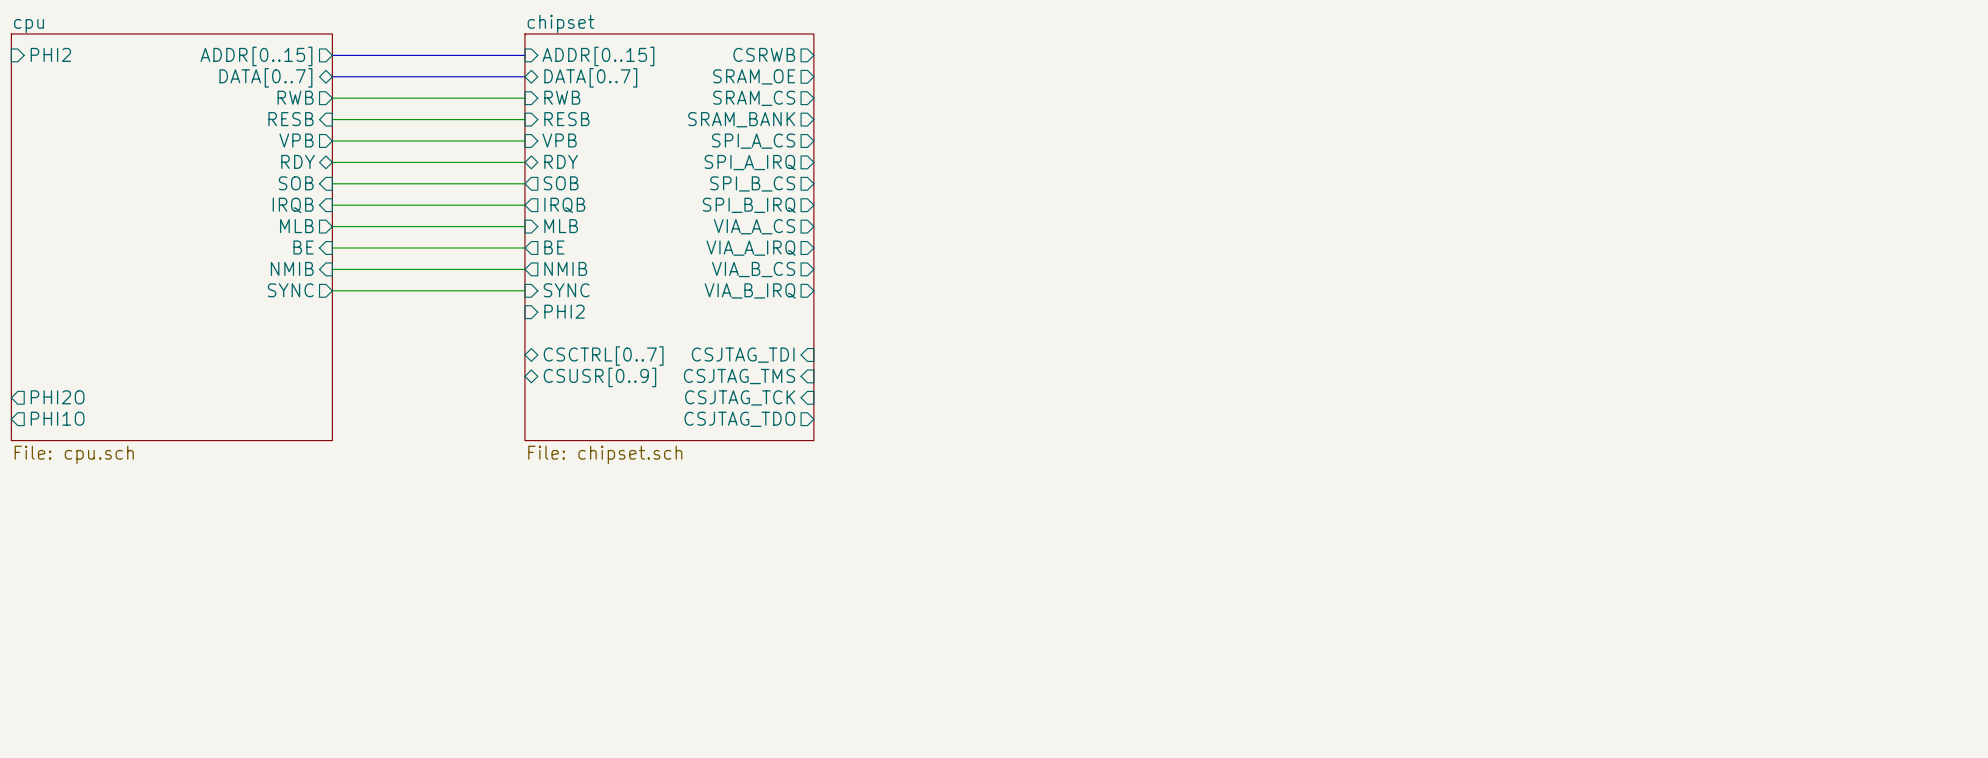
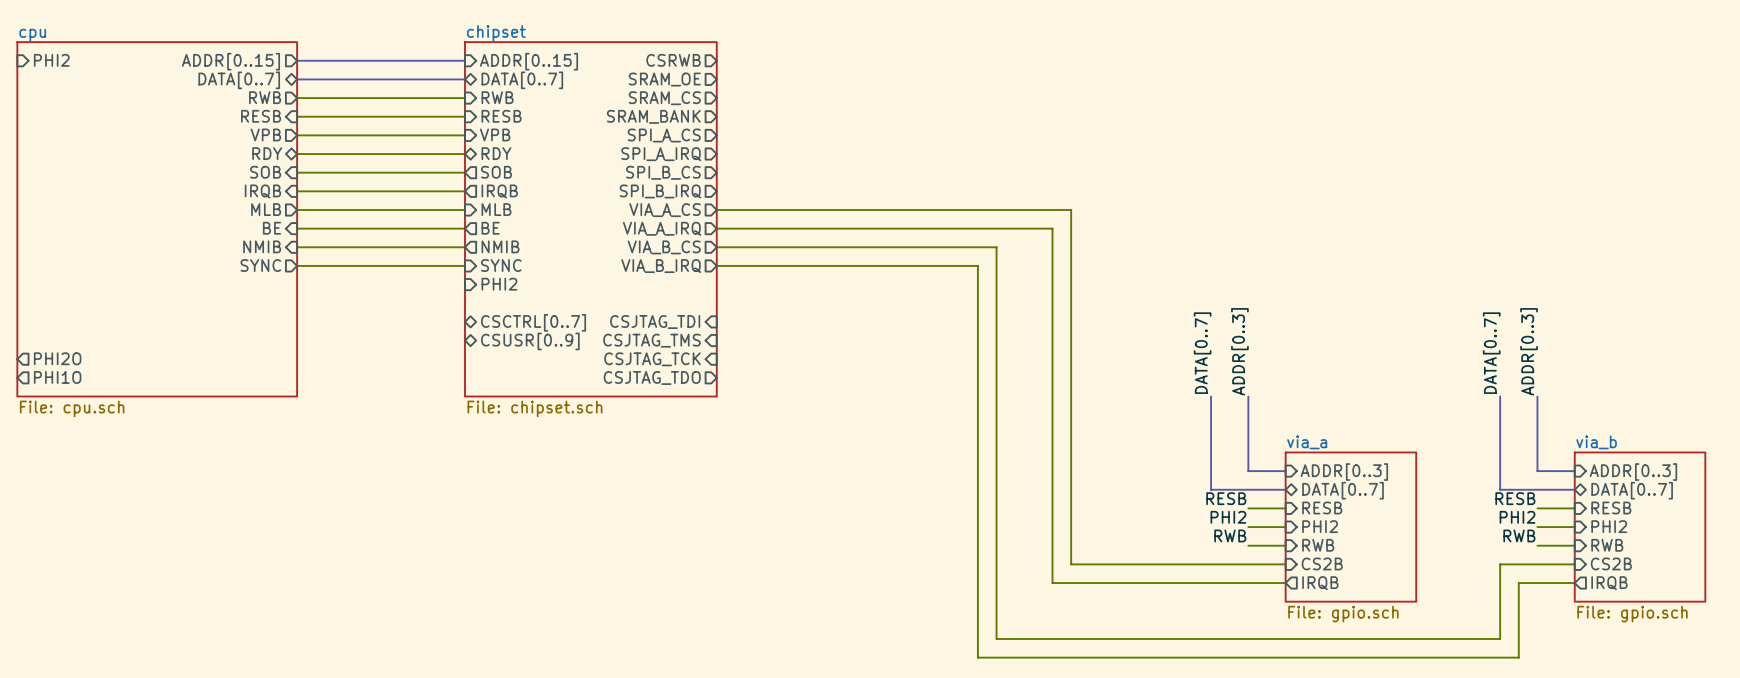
wire: none -> (716, 209) (1071, 209) (1071, 564) (1285, 564)
wire: none -> (716, 228) (1052, 228) (1052, 583) (1285, 583)
wire: none -> (716, 247) (996, 247) (996, 638) (1500, 638) (1500, 564) (1574, 564)
wire: none -> (716, 265) (977, 265) (977, 657) (1518, 657) (1518, 583) (1574, 583)
label: none -> ADDR[0..3] (1239, 351)
label: none -> ADDR[0..3] (1529, 351)
label: none -> DATA[0..7] (1202, 353)
label: none -> DATA[0..7] (1491, 353)
bus: none -> (1211, 396) (1211, 489) (1285, 489)
bus: none -> (1248, 396) (1248, 471) (1285, 471)
bus: none -> (1500, 396) (1500, 489) (1574, 489)
bus: none -> (1537, 396) (1537, 471) (1574, 471)
sheet pin: none -> ADDR[0..3] (1344, 472)
sheet pin: none -> ADDR[0..3] (1633, 472)
sheet pin: none -> DATA[0..7] (1343, 490)
sheet pin: none -> DATA[0..7] (1632, 490)
label: none -> RESB (1226, 498)
label: none -> RESB (1515, 498)
sheet pin: none -> RESB (1322, 508)
sheet pin: none -> RESB (1611, 508)
wire: none -> (1248, 508) (1285, 508)
wire: none -> (1537, 508) (1574, 508)
label: none -> PHI2 (1228, 517)
label: none -> PHI2 (1517, 517)
sheet pin: none -> PHI2 (1320, 526)
sheet pin: none -> PHI2 (1609, 526)
wire: none -> (1248, 527) (1285, 527)
sheet via_a: none -> File: gpio.sch (1350, 527)
wire: none -> (1537, 527) (1574, 527)
sheet via_b: none -> File: gpio.sch (1640, 527)
label: none -> RWB (1230, 535)
label: none -> RWB (1519, 535)
wire: none -> (1248, 545) (1285, 545)
sheet pin: none -> RWB (1318, 545)
wire: none -> (1537, 545) (1574, 545)
sheet pin: none -> RWB (1607, 545)
sheet pin: none -> CS2B (1322, 563)
sheet pin: none -> CS2B (1611, 563)
sheet pin: none -> IRQB (1320, 583)
sheet pin: none -> IRQB (1609, 583)

